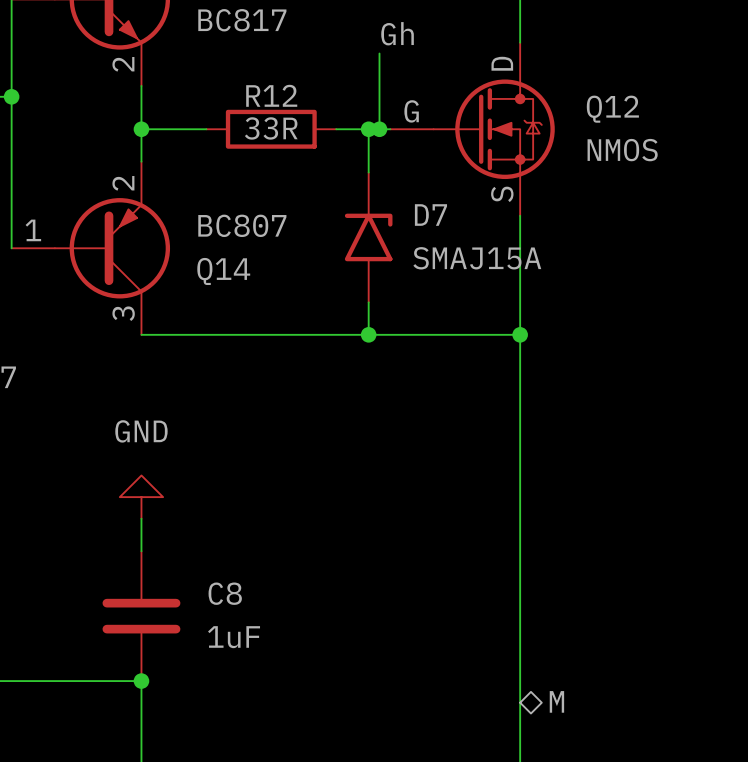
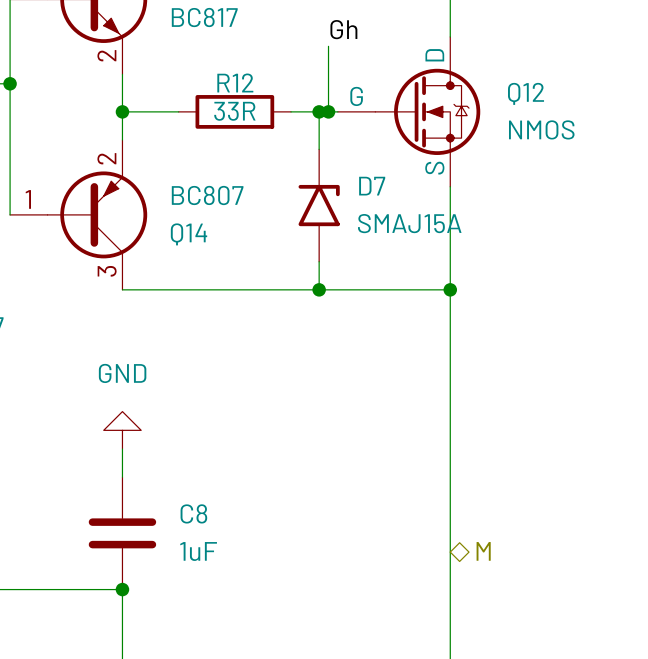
hierarchical label position: M (556, 701) -> M (483, 551)

